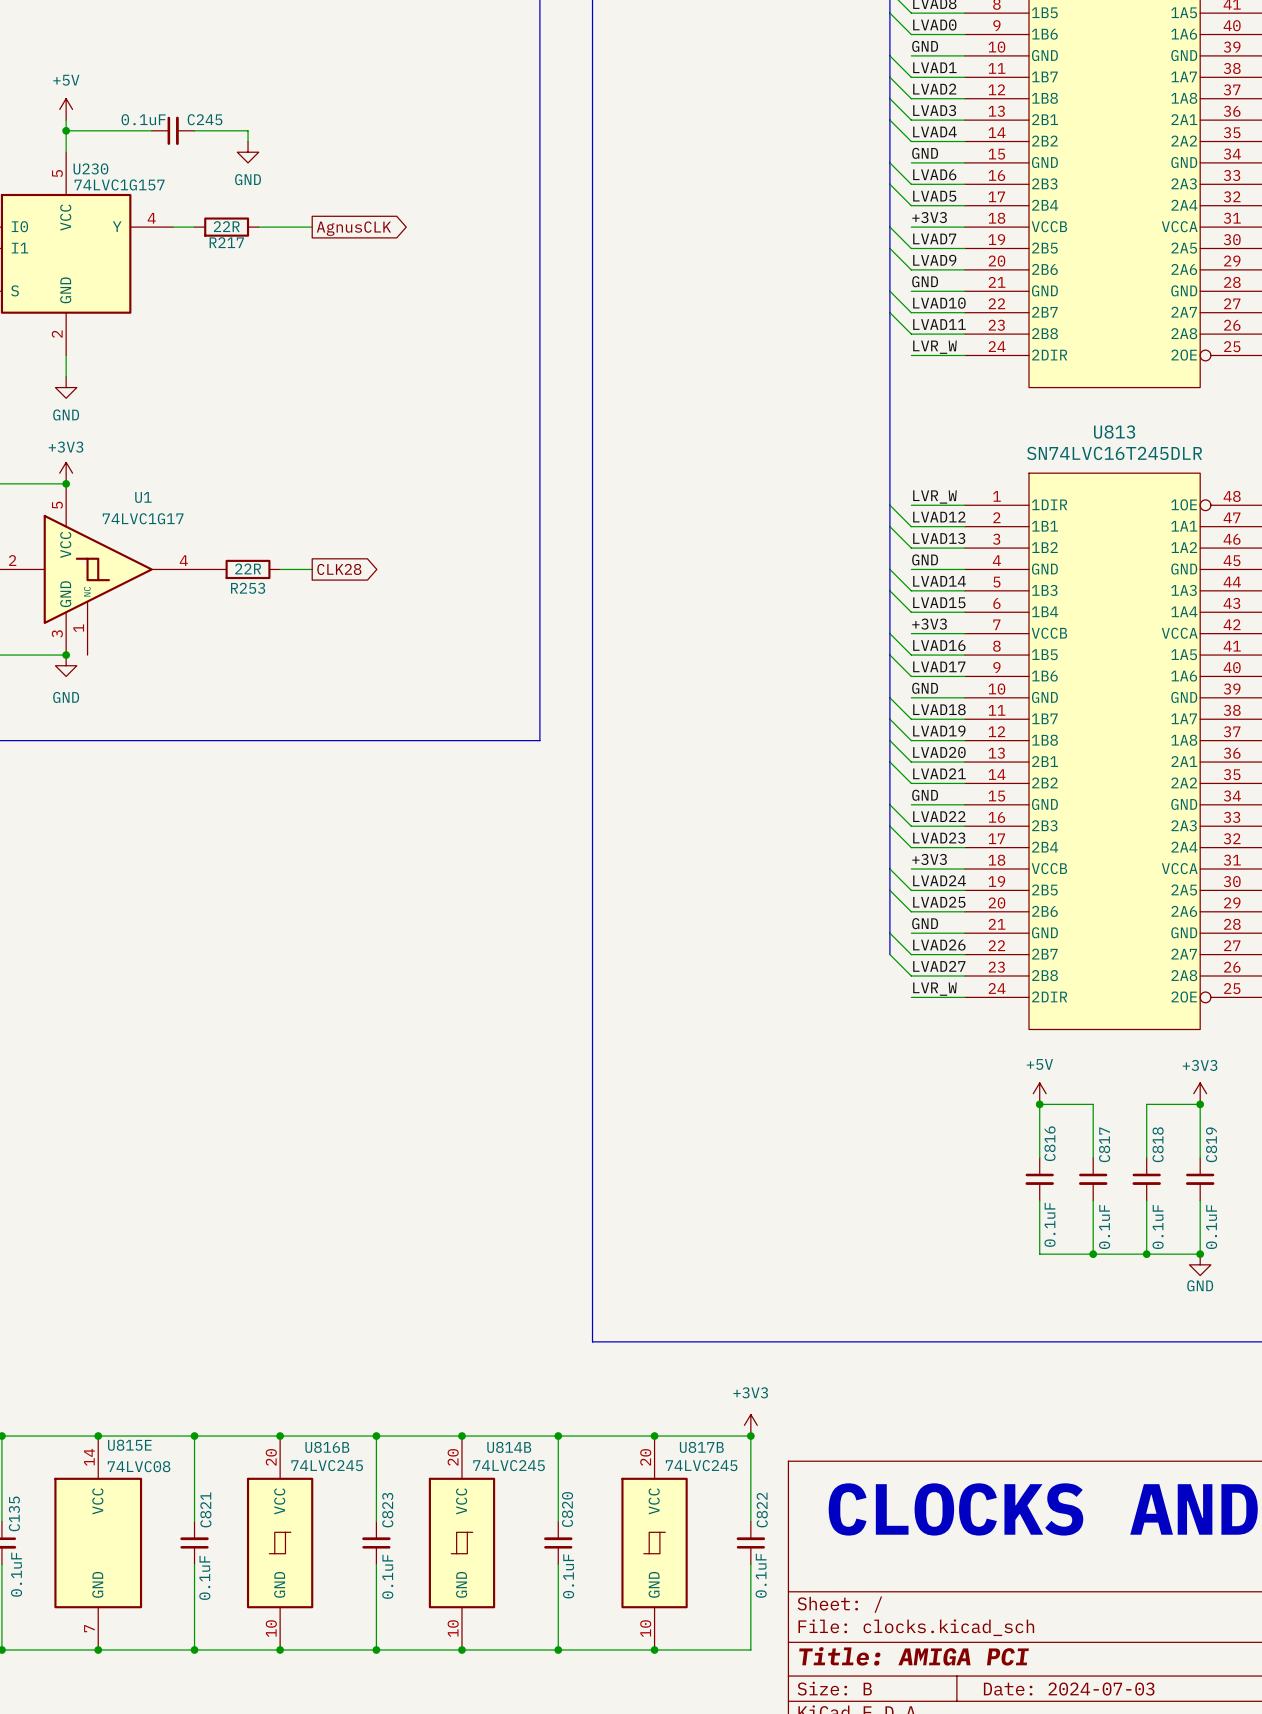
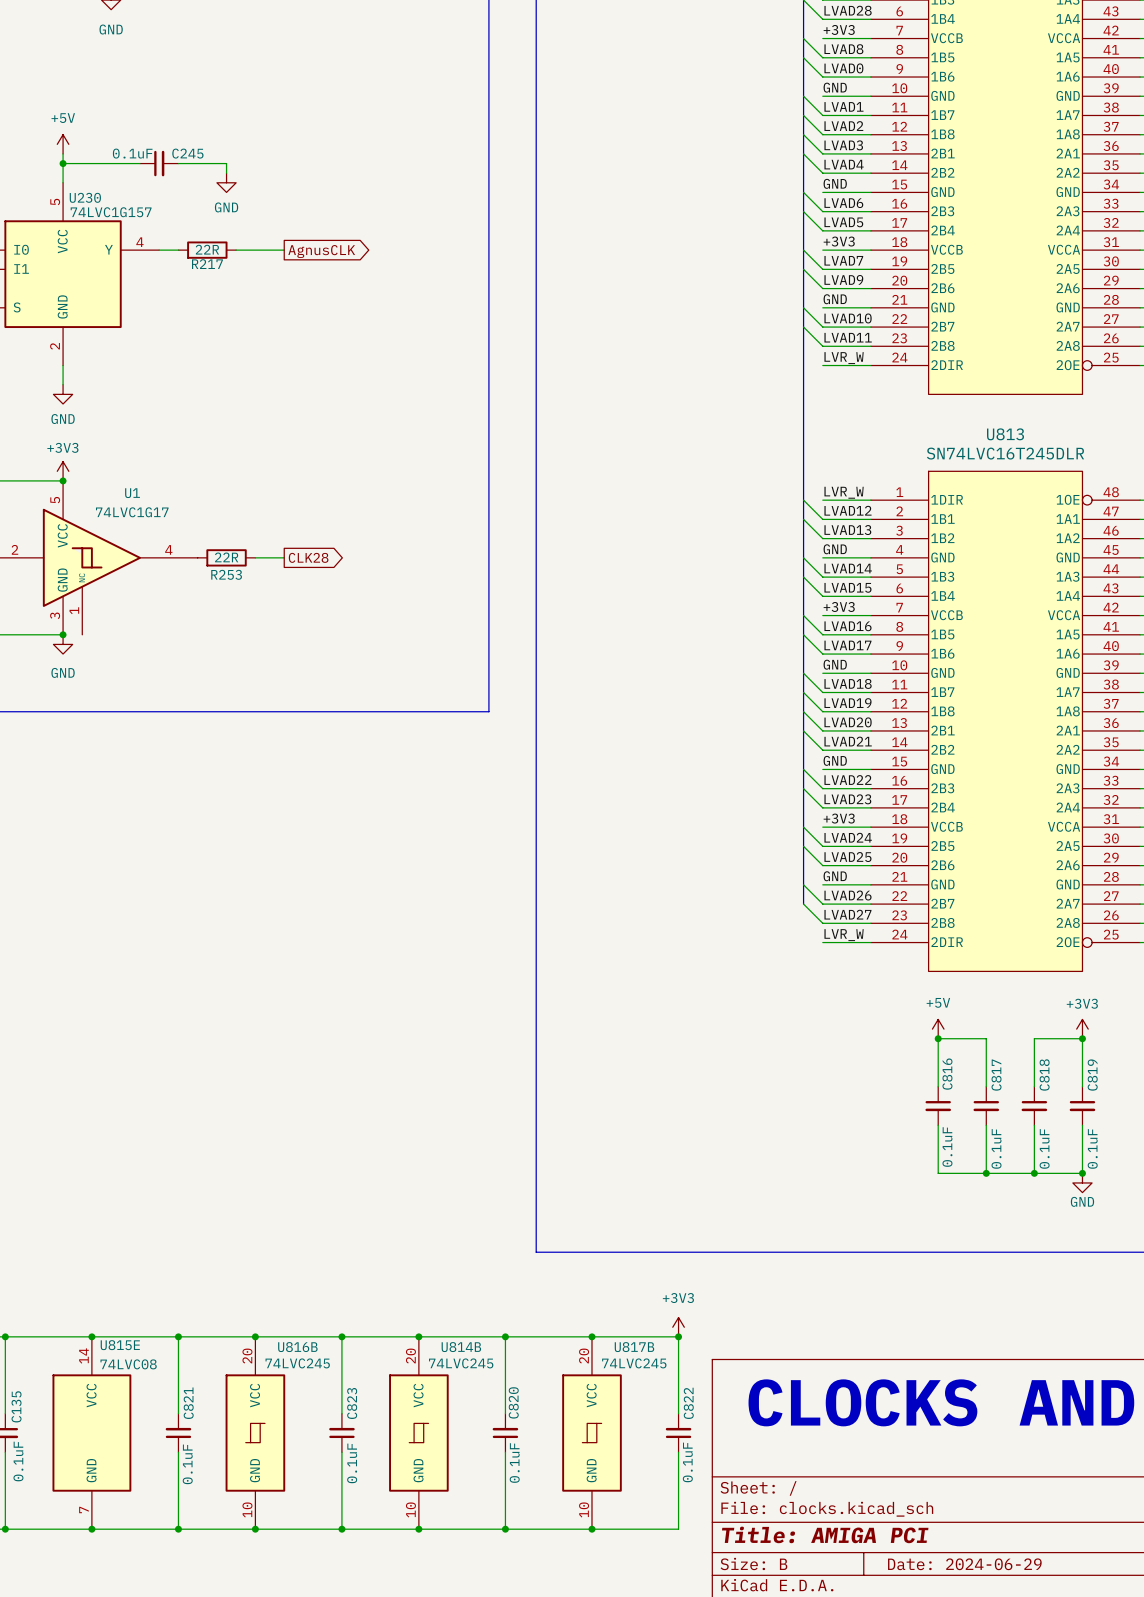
title block: Date: 2024-07-03 (1069, 1689) -> Date: 2024-06-29 (964, 1564)

